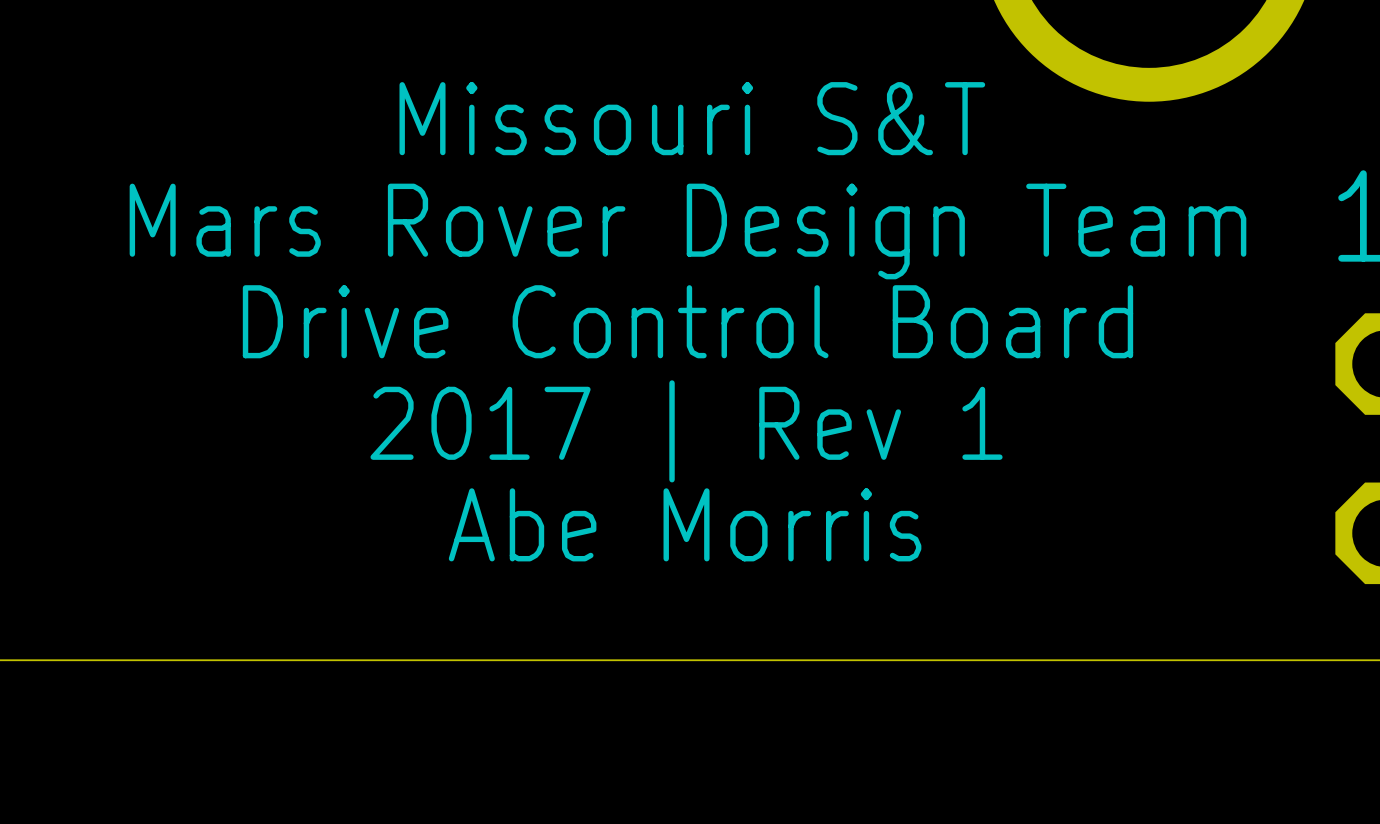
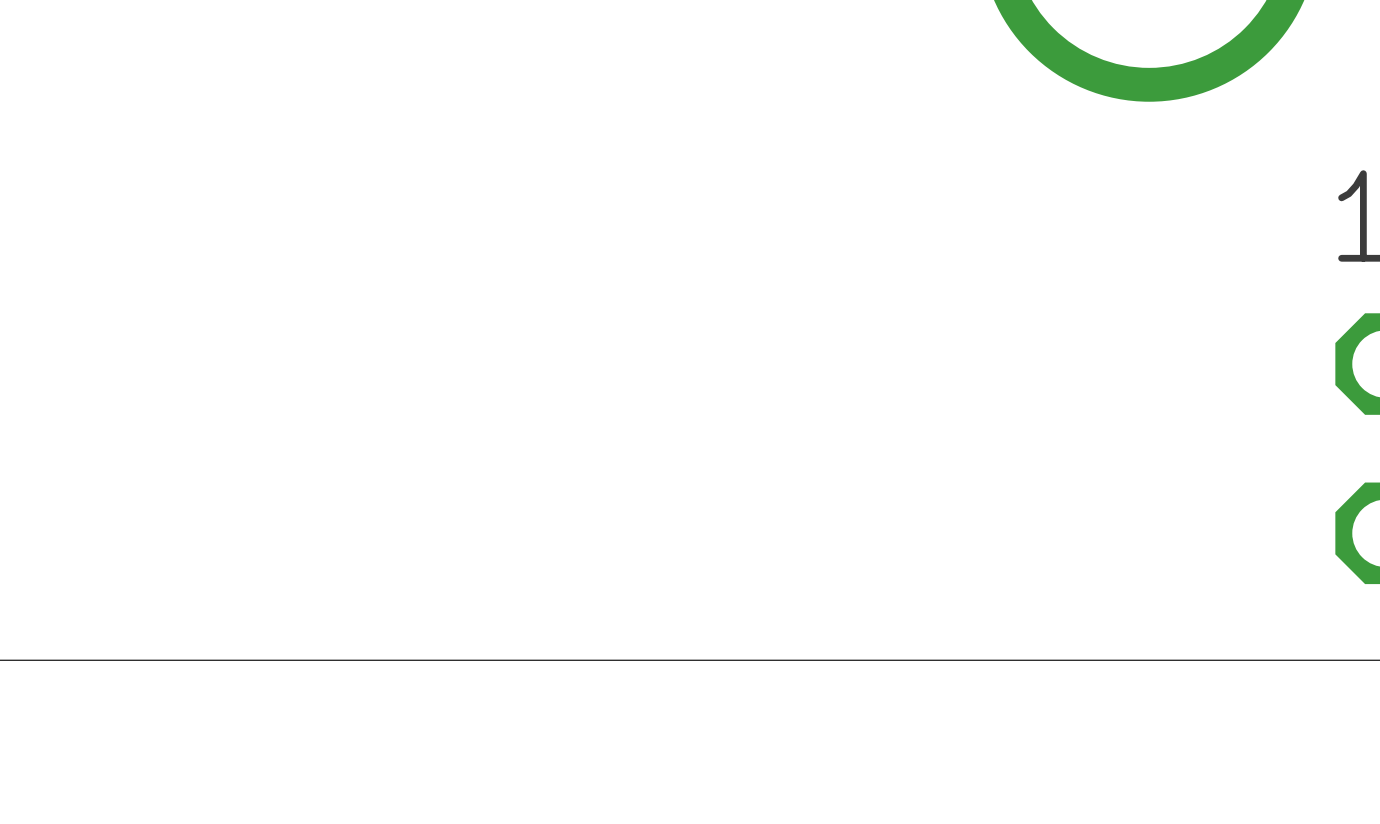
text: Missouri S&T (692, 118) -> none
text: Mars Rover Design Team (687, 231) -> none
text: Drive Control Board (687, 321) -> none
text: 2017 | Rev 1 (686, 431) -> none
text: Abe Morris (685, 524) -> none

